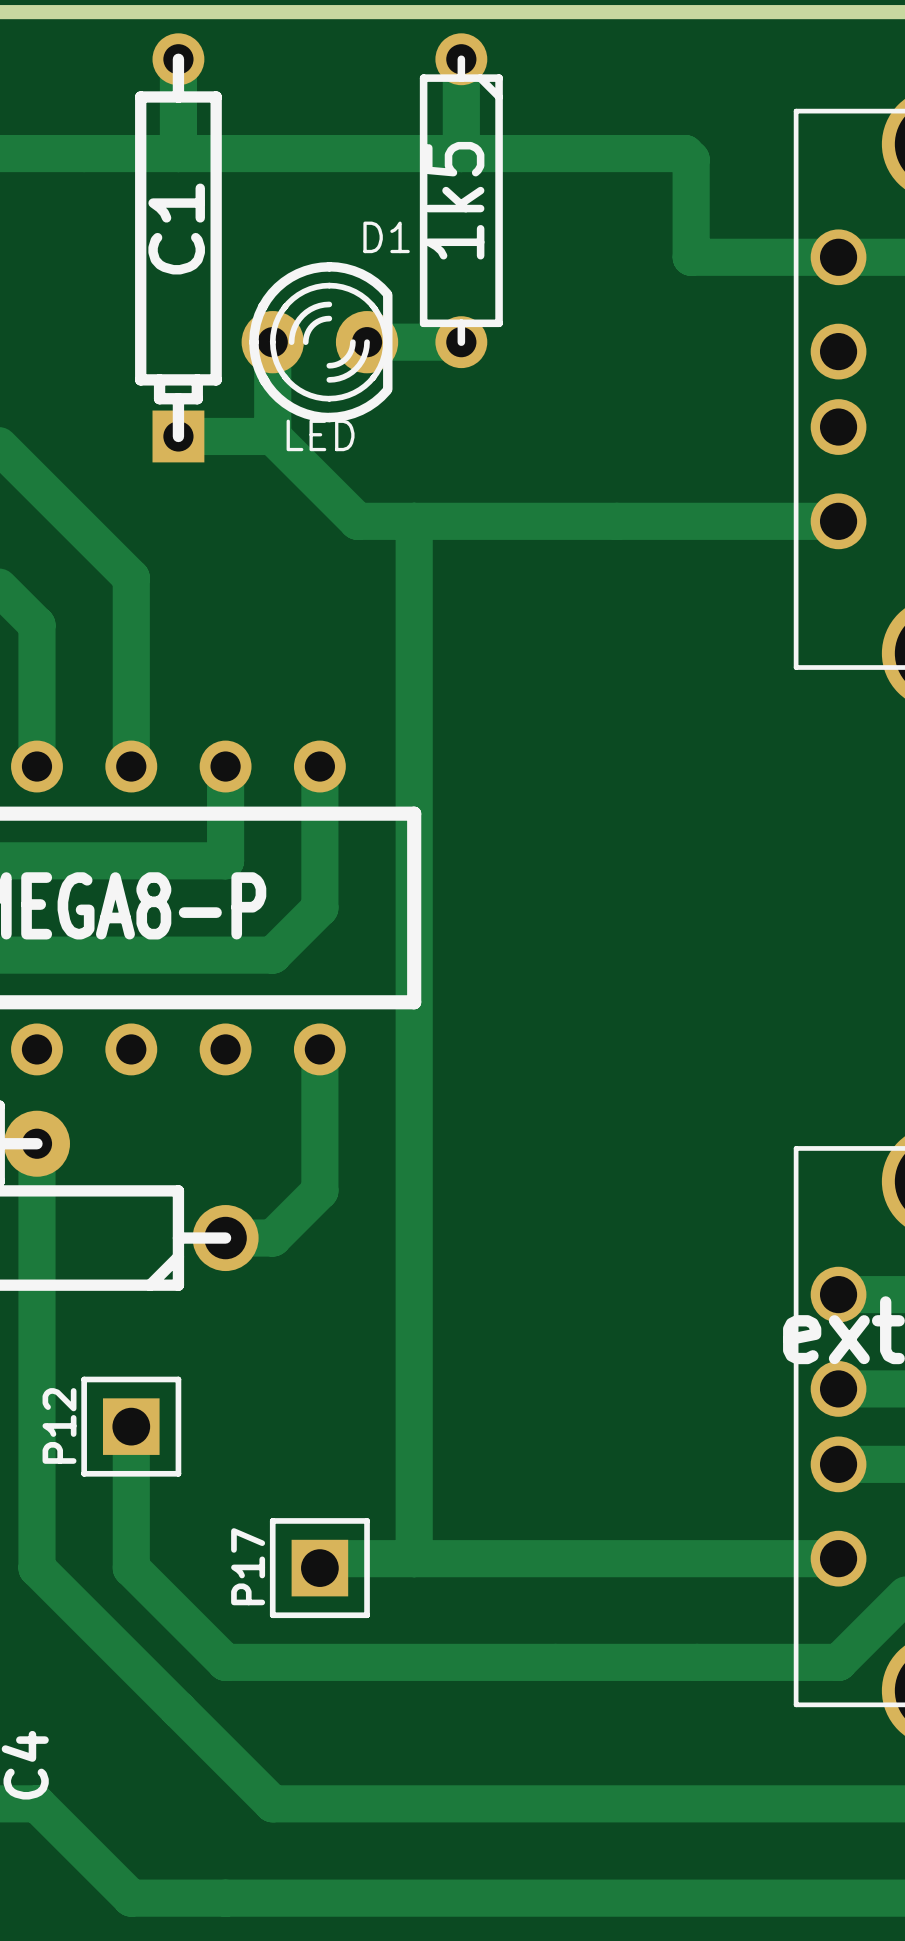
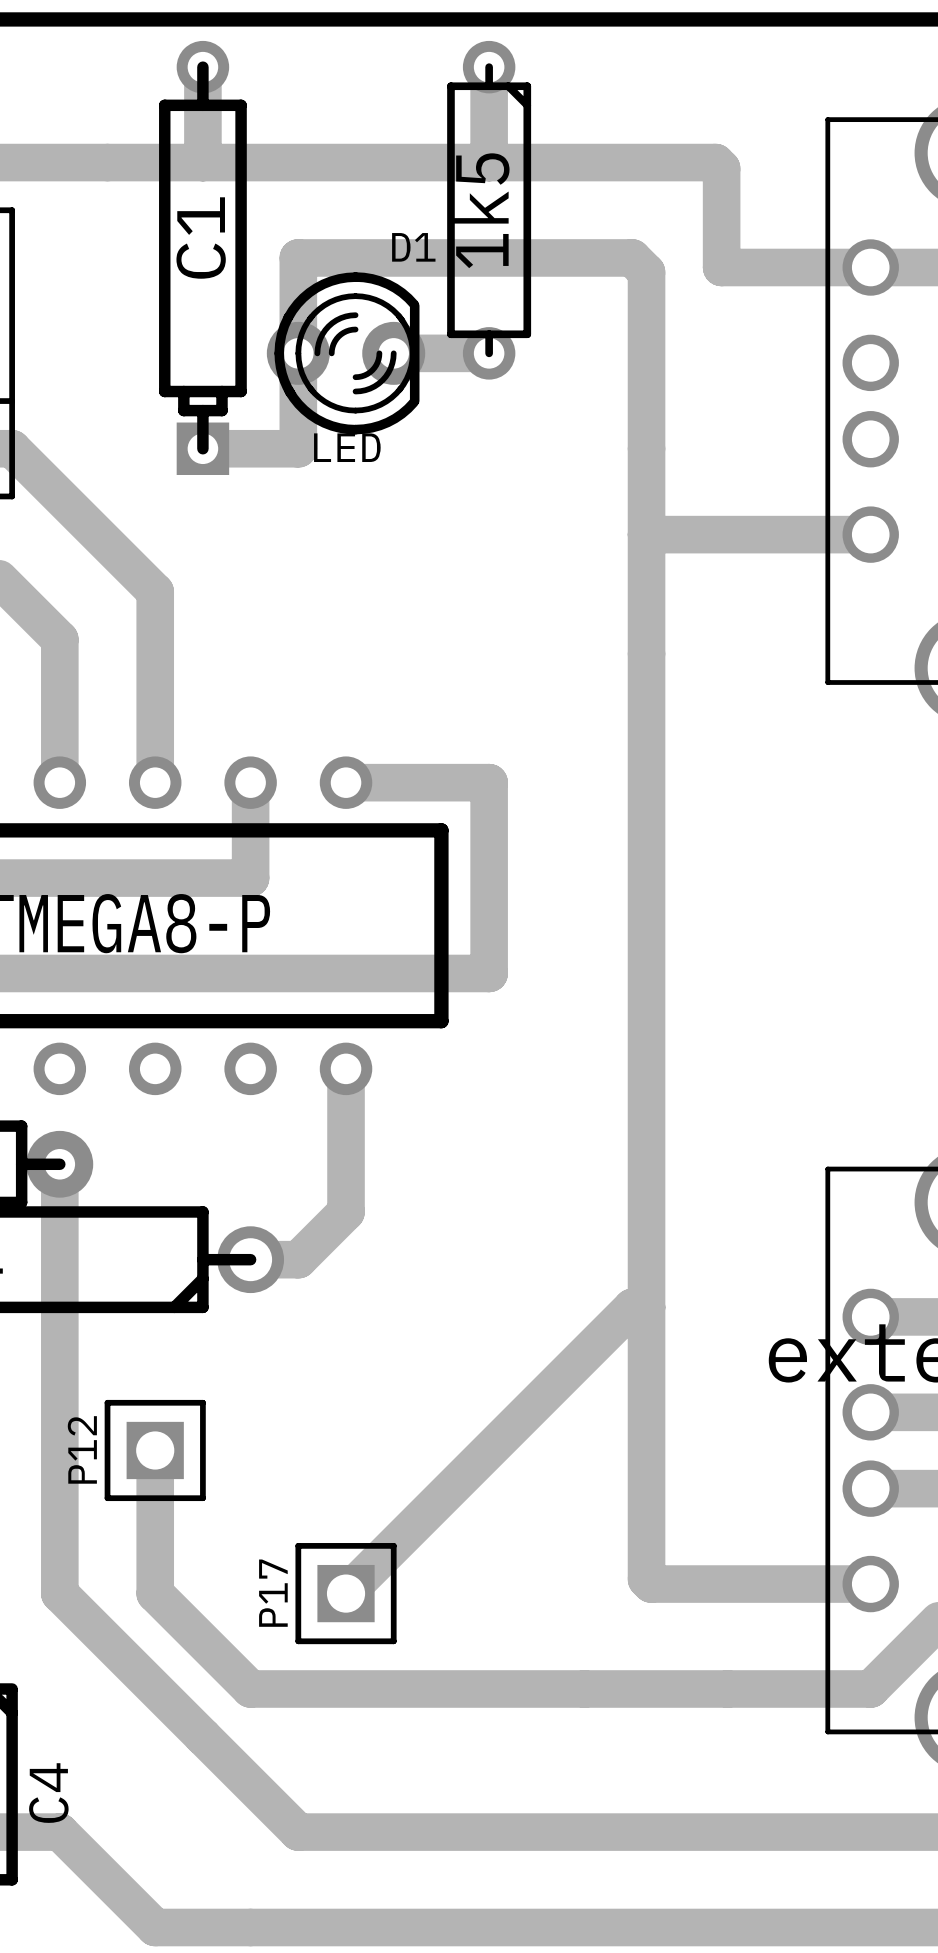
track: none -> (298, 353) (298, 257) (632, 257) (646, 272) (646, 1579) (651, 1584)
track: (272, 436) (357, 521) (616, 521) -> none
track: (414, 521) (414, 1558) -> none
track: (319, 766) (319, 907) (272, 955) -> (346, 782) (489, 782) (489, 973) (298, 973)
track: (329, 1558) (621, 1558) -> (355, 1584) (632, 1307) (646, 1307)

